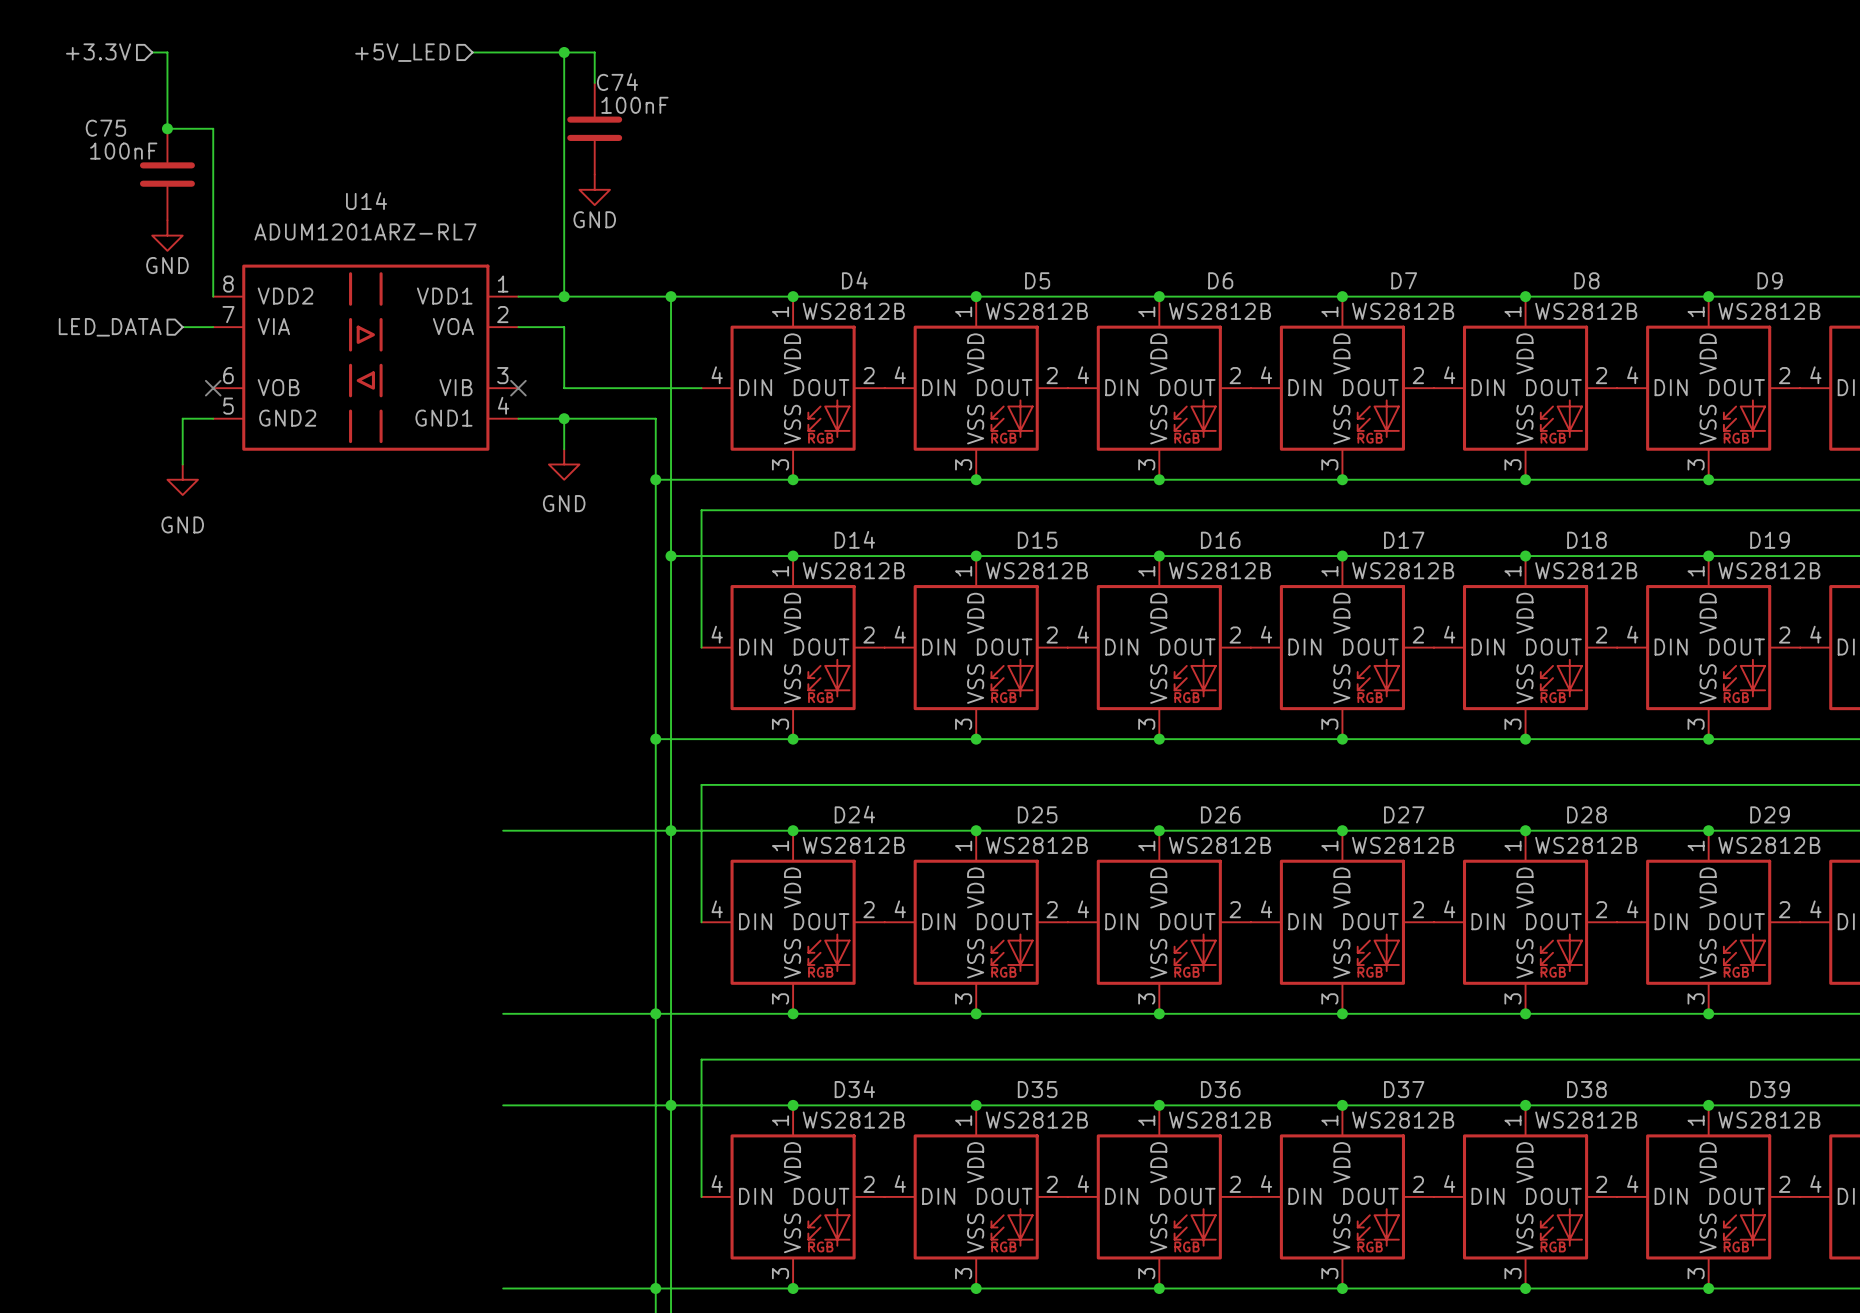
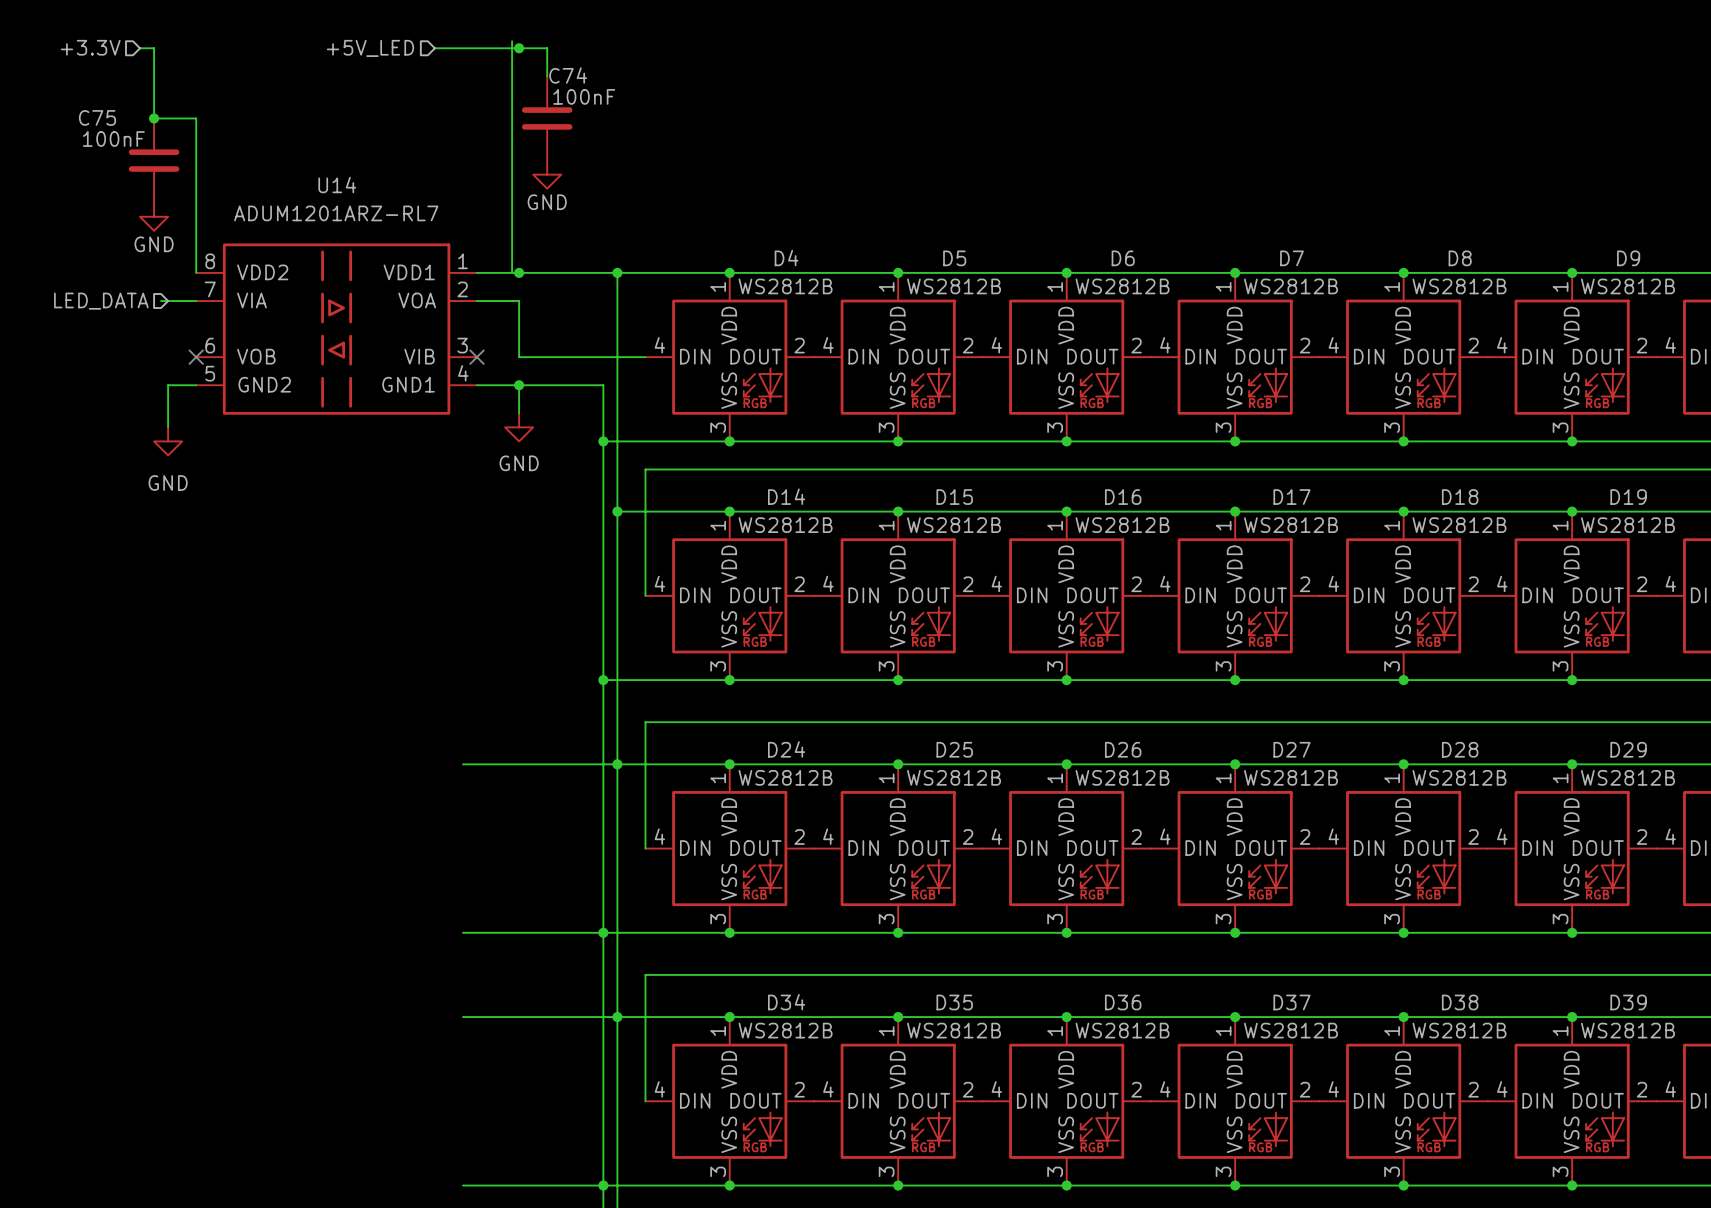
wire: none -> (512, 41) (512, 272)
wire: (564, 52) (564, 296) -> none
wire: none -> (161, 301) (168, 301)

